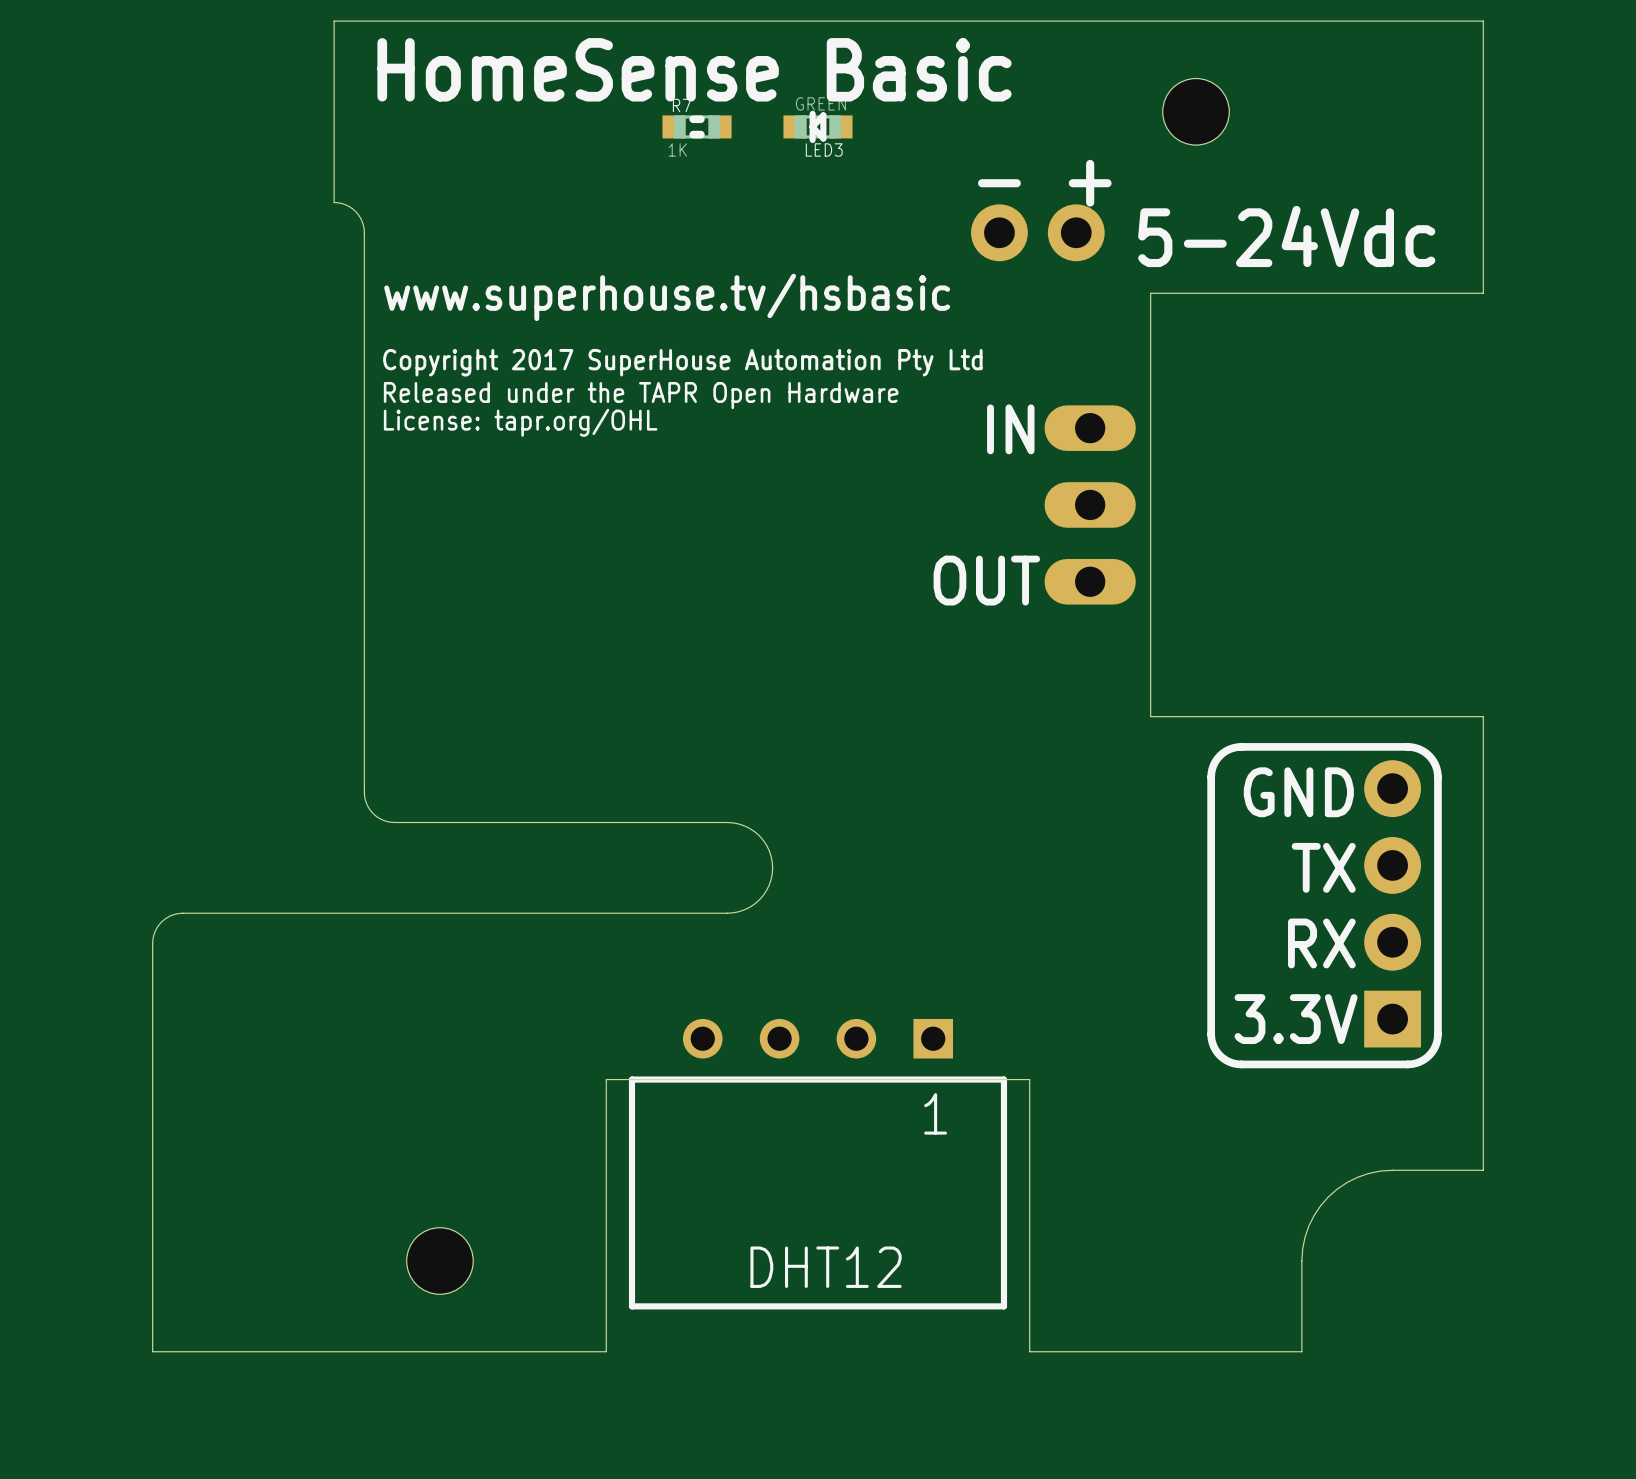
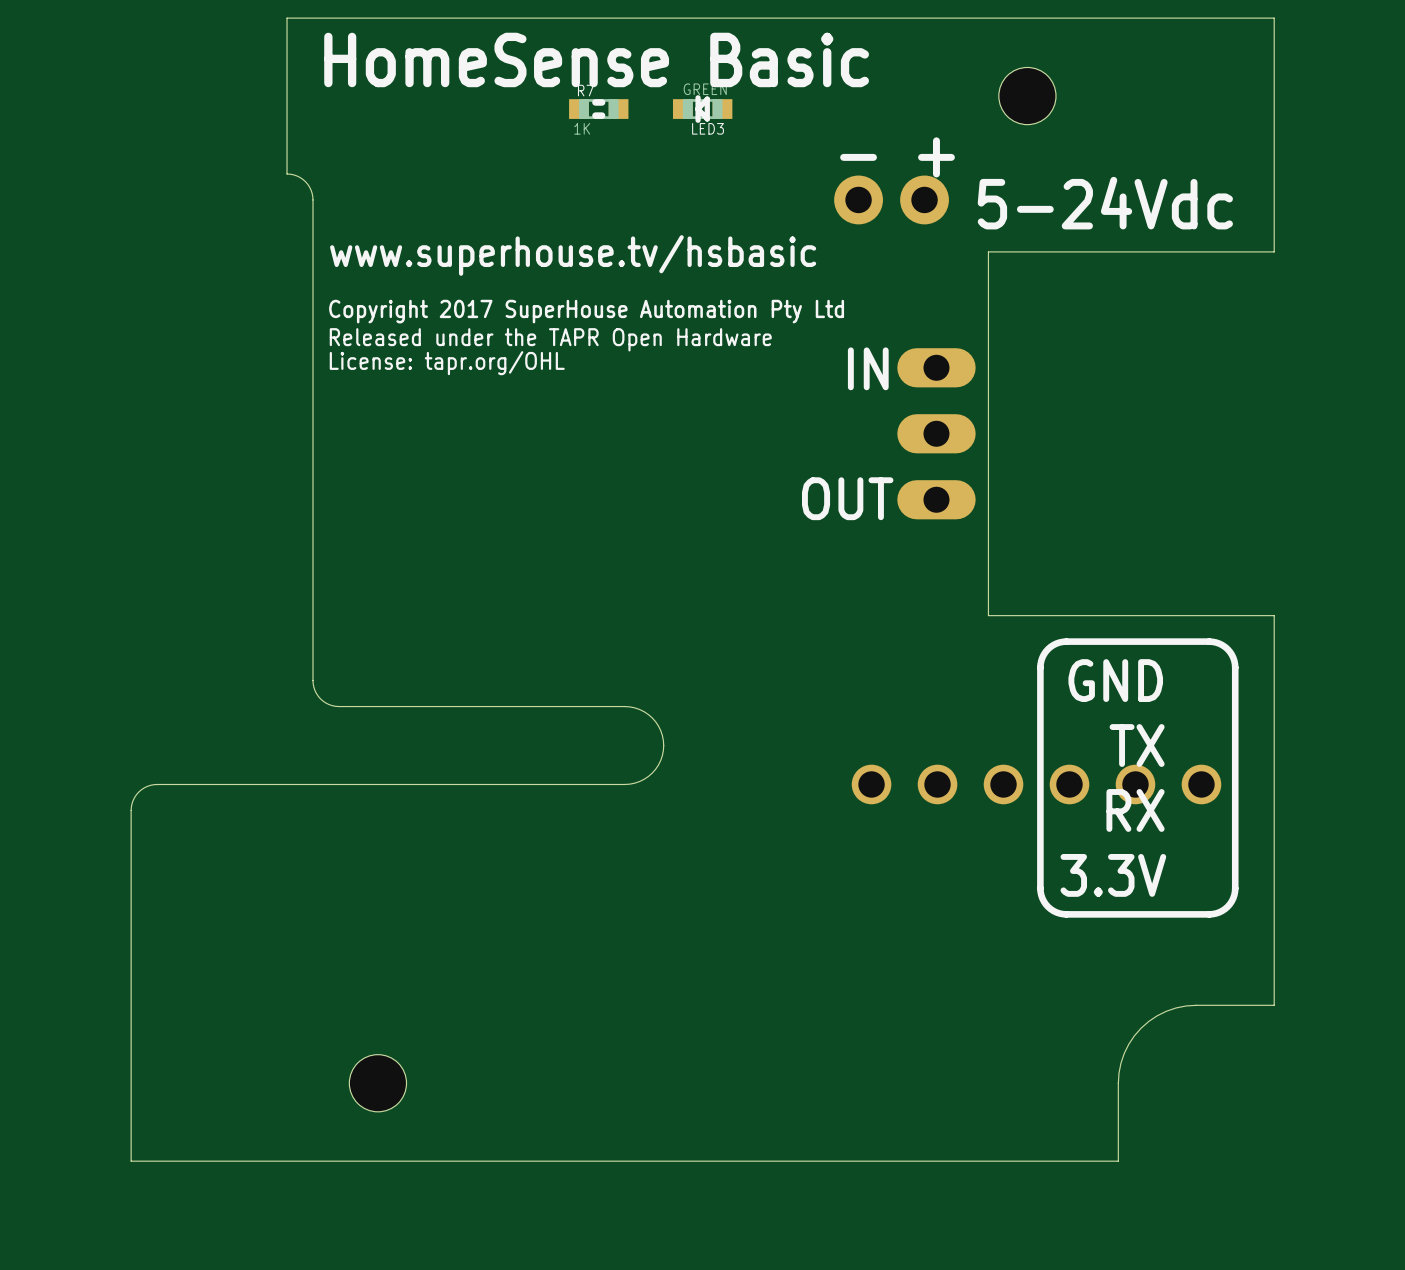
part: (1392, 903) -> none
part: none -> (1036, 784)
part: (817, 1164) -> none
board edge: (1029, 1351) (1029, 1079) (606, 1079) (606, 1351) -> (884, 1161) (520, 1161)

